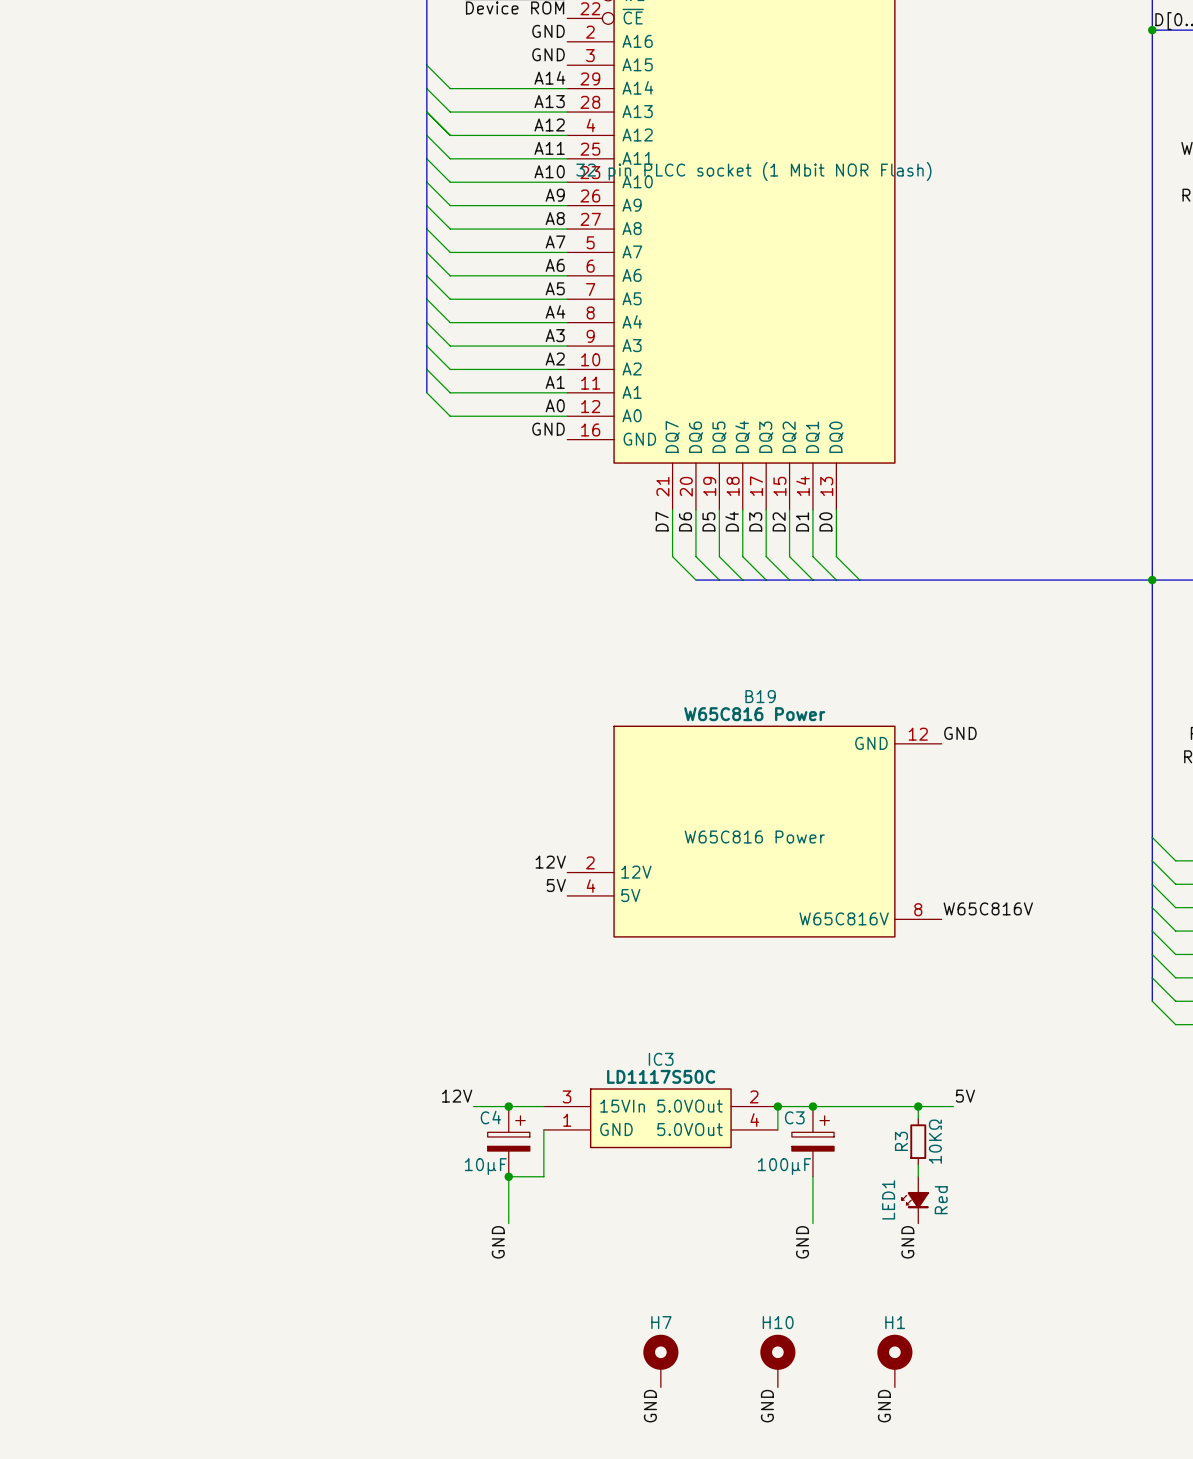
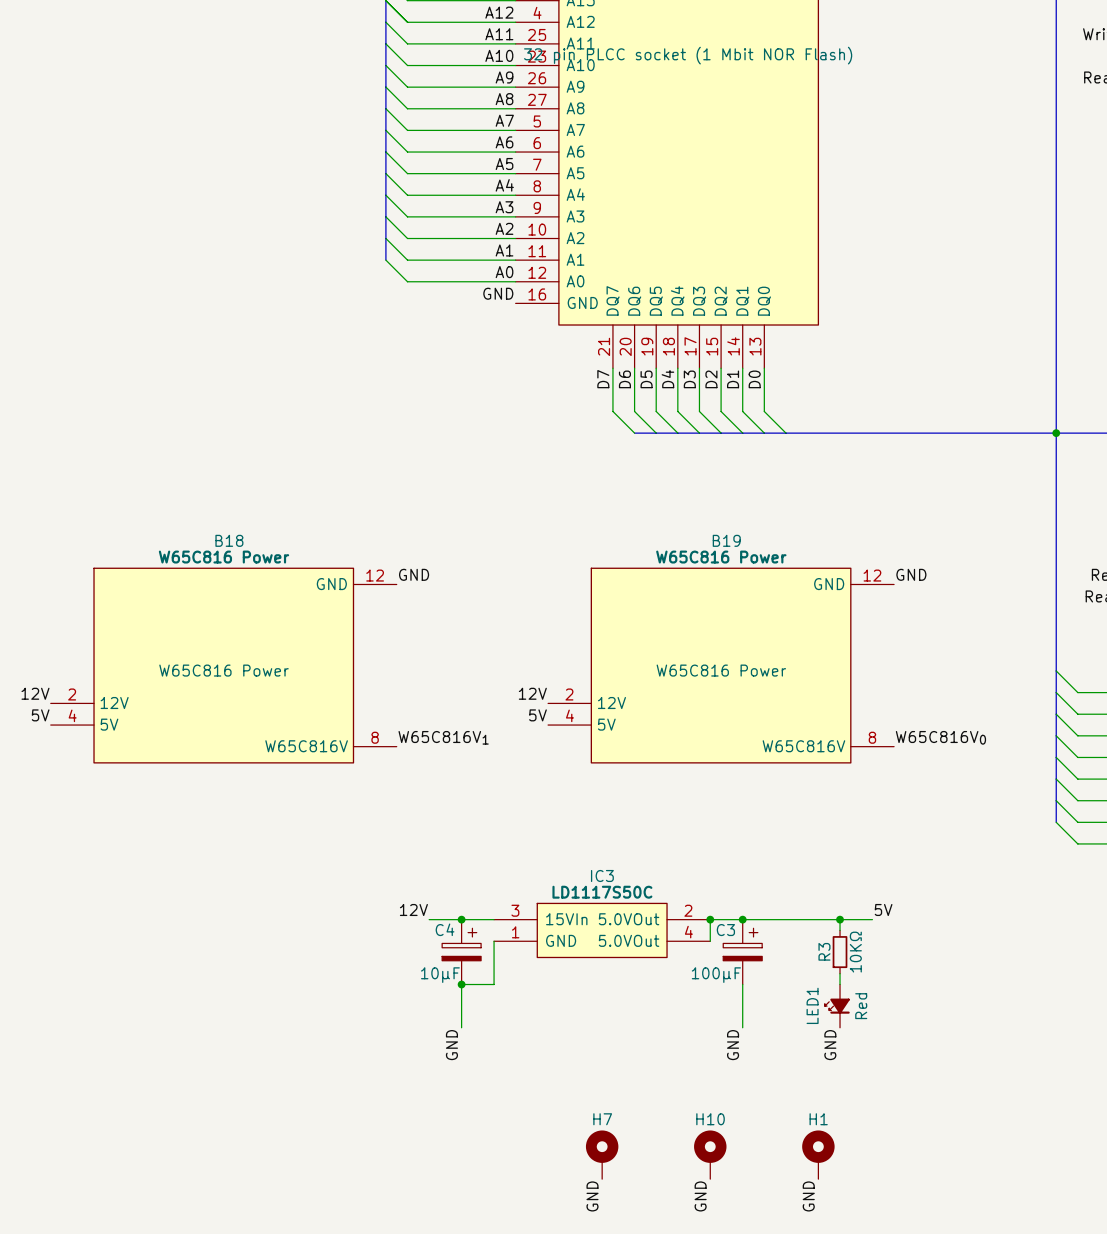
label: none -> GND (414, 574)
label position: GND (960, 733) -> GND (911, 574)
B18: none -> W65C816 Power (223, 665)
B19 position: (754, 831) -> (721, 665)
label: none -> 12V (35, 693)
label position: 12V (550, 862) -> 12V (532, 693)
label: none -> 5V (40, 715)
label position: 5V (556, 885) -> 5V (537, 715)
label: W65C816V (988, 908) -> W65C816V0 (940, 737)
label: none -> W65C816V1 (443, 737)

